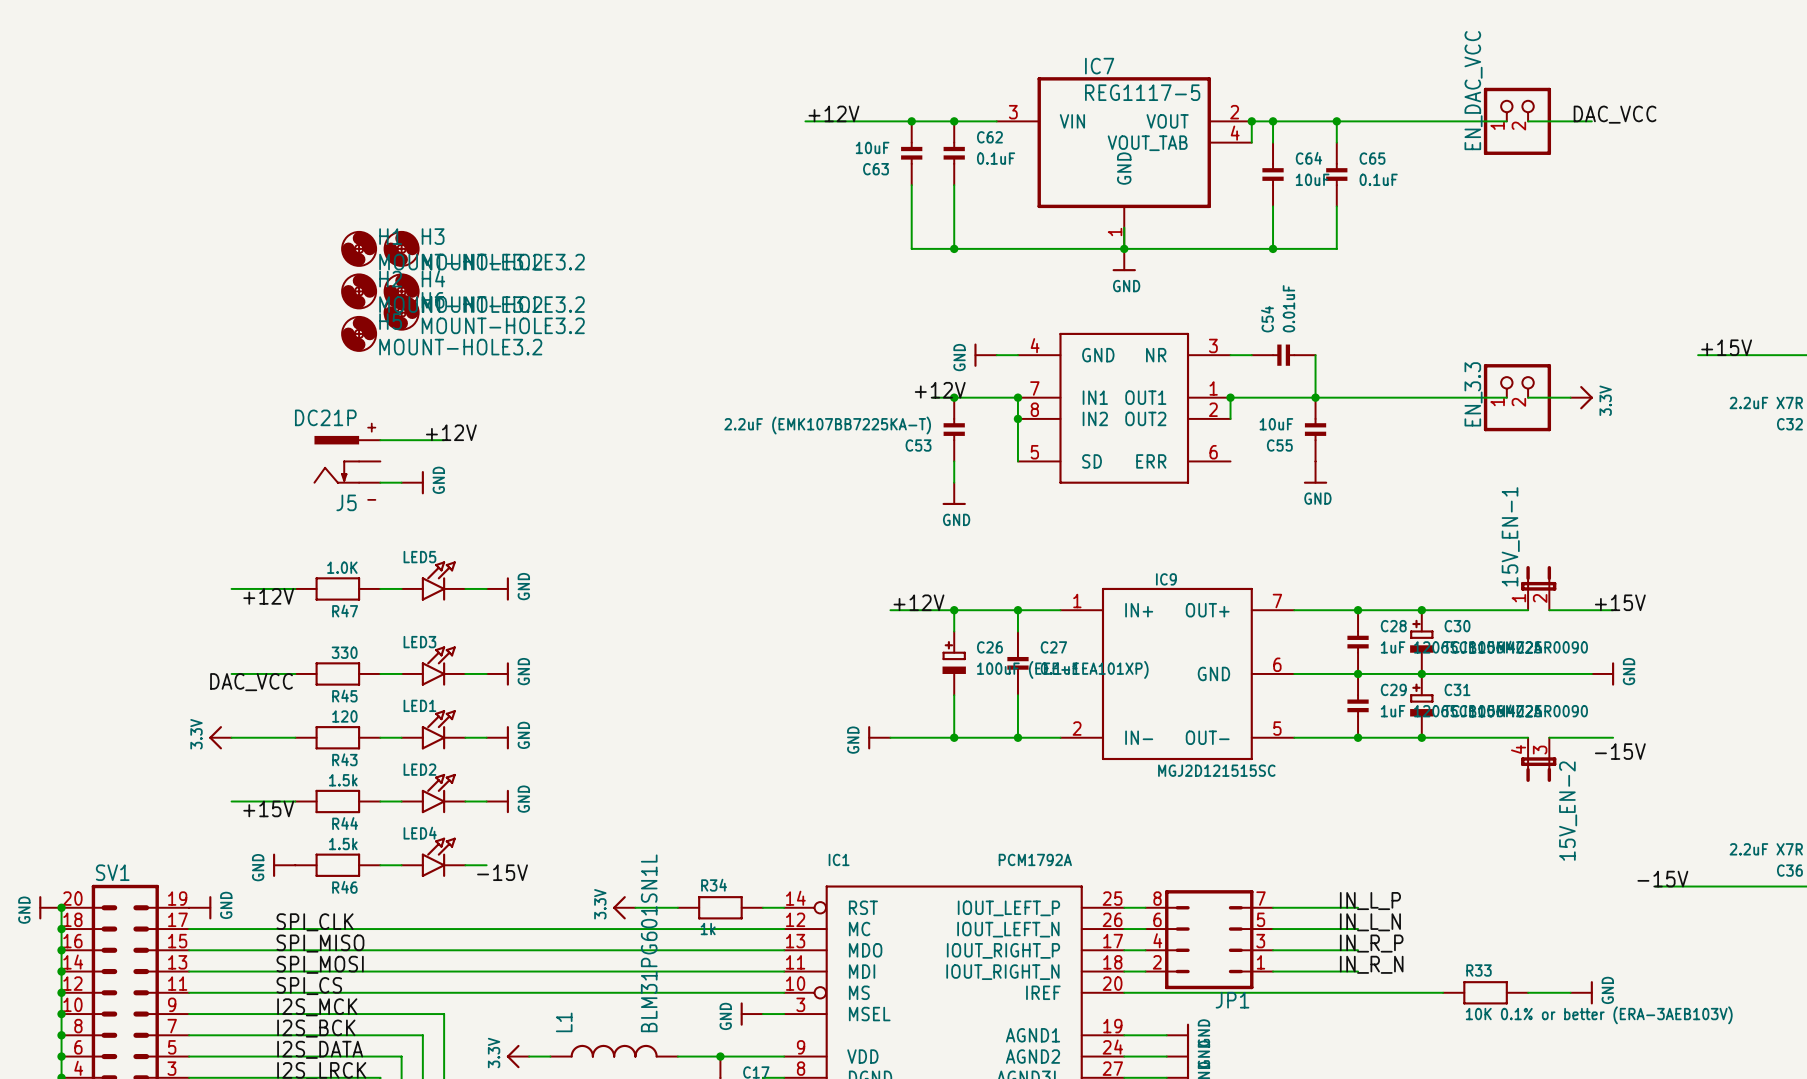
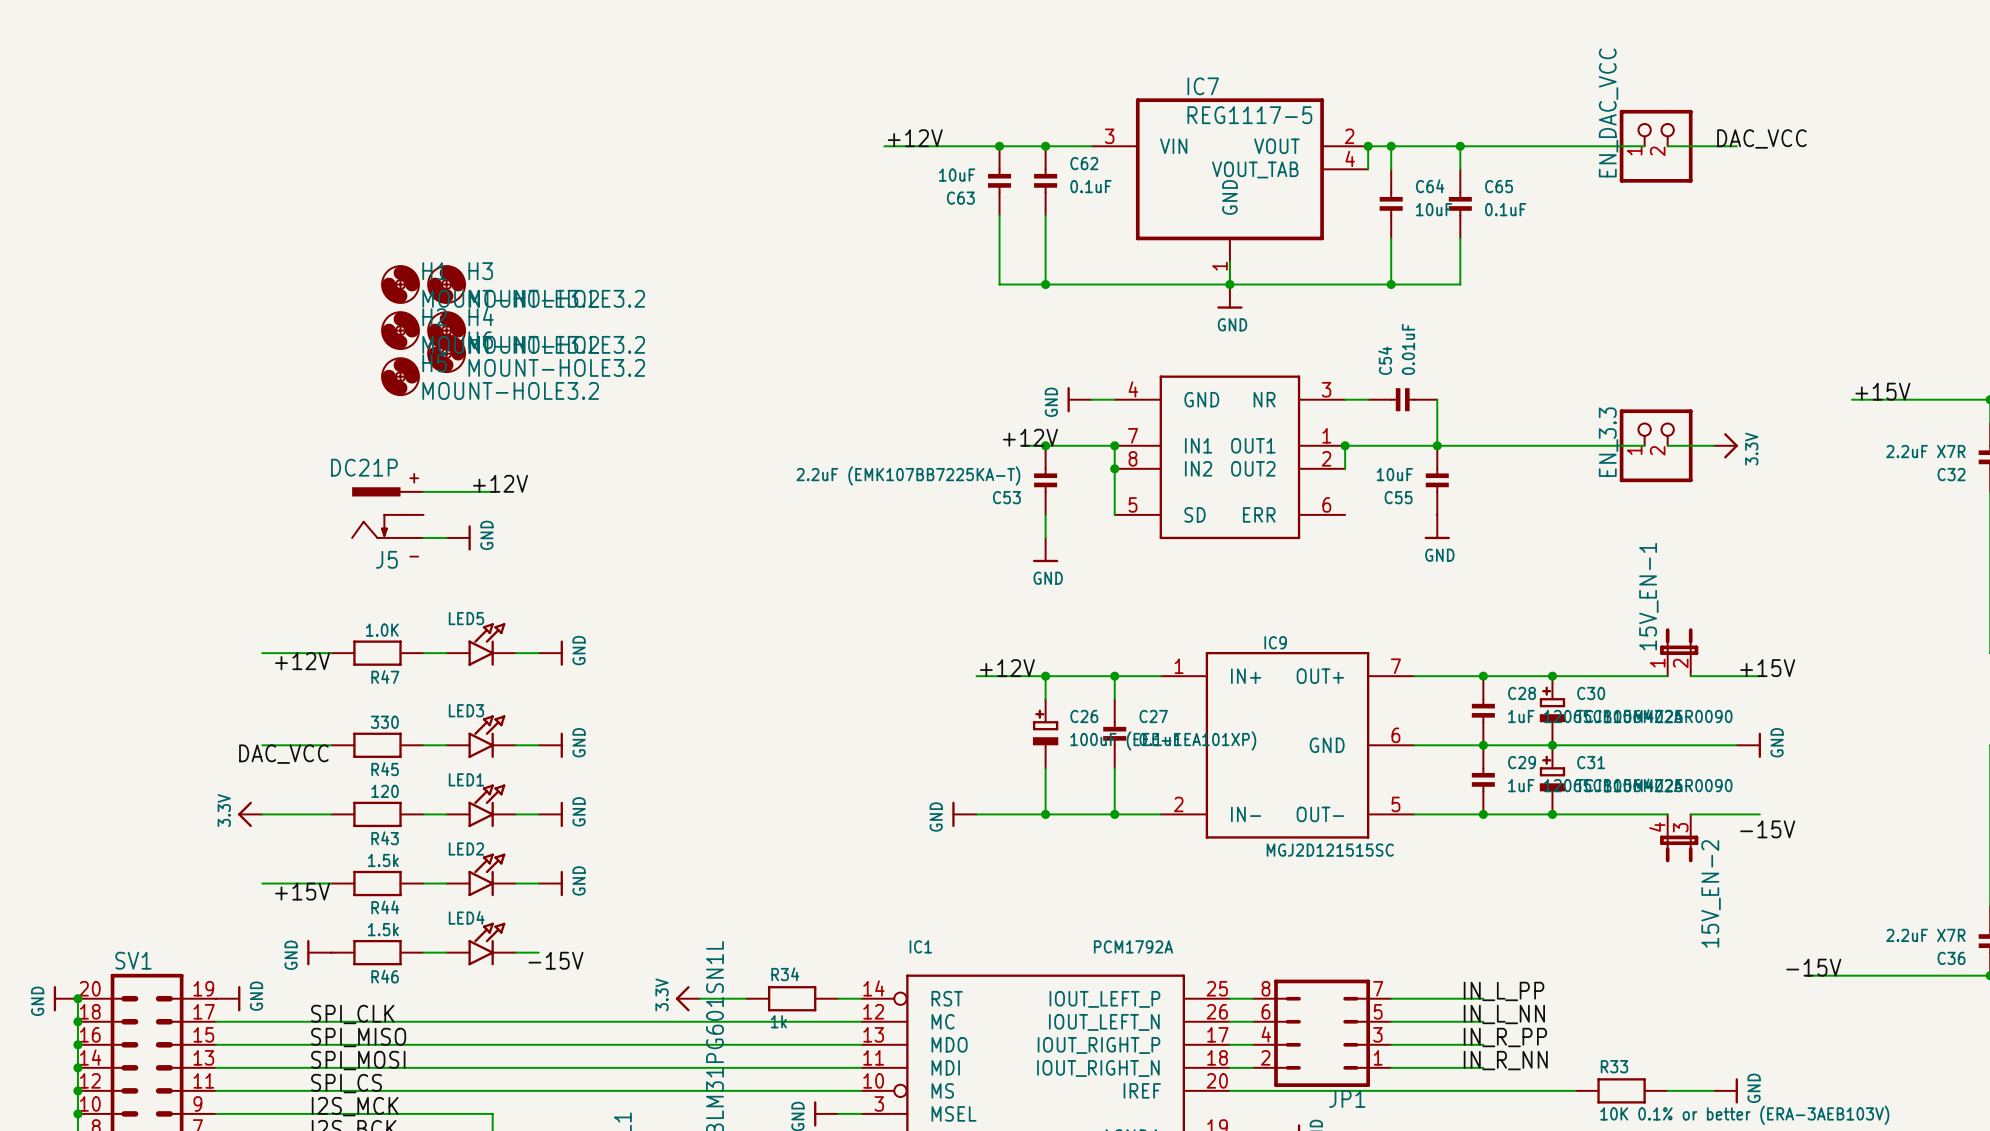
label: IN_L_P (1370, 901) -> IN_L_PP (1504, 991)
label: IN_L_N (1370, 922) -> IN_L_NN (1504, 1014)
label: IN_R_P (1371, 943) -> IN_R_PP (1505, 1037)
label: IN_R_N (1371, 964) -> IN_R_NN (1505, 1060)

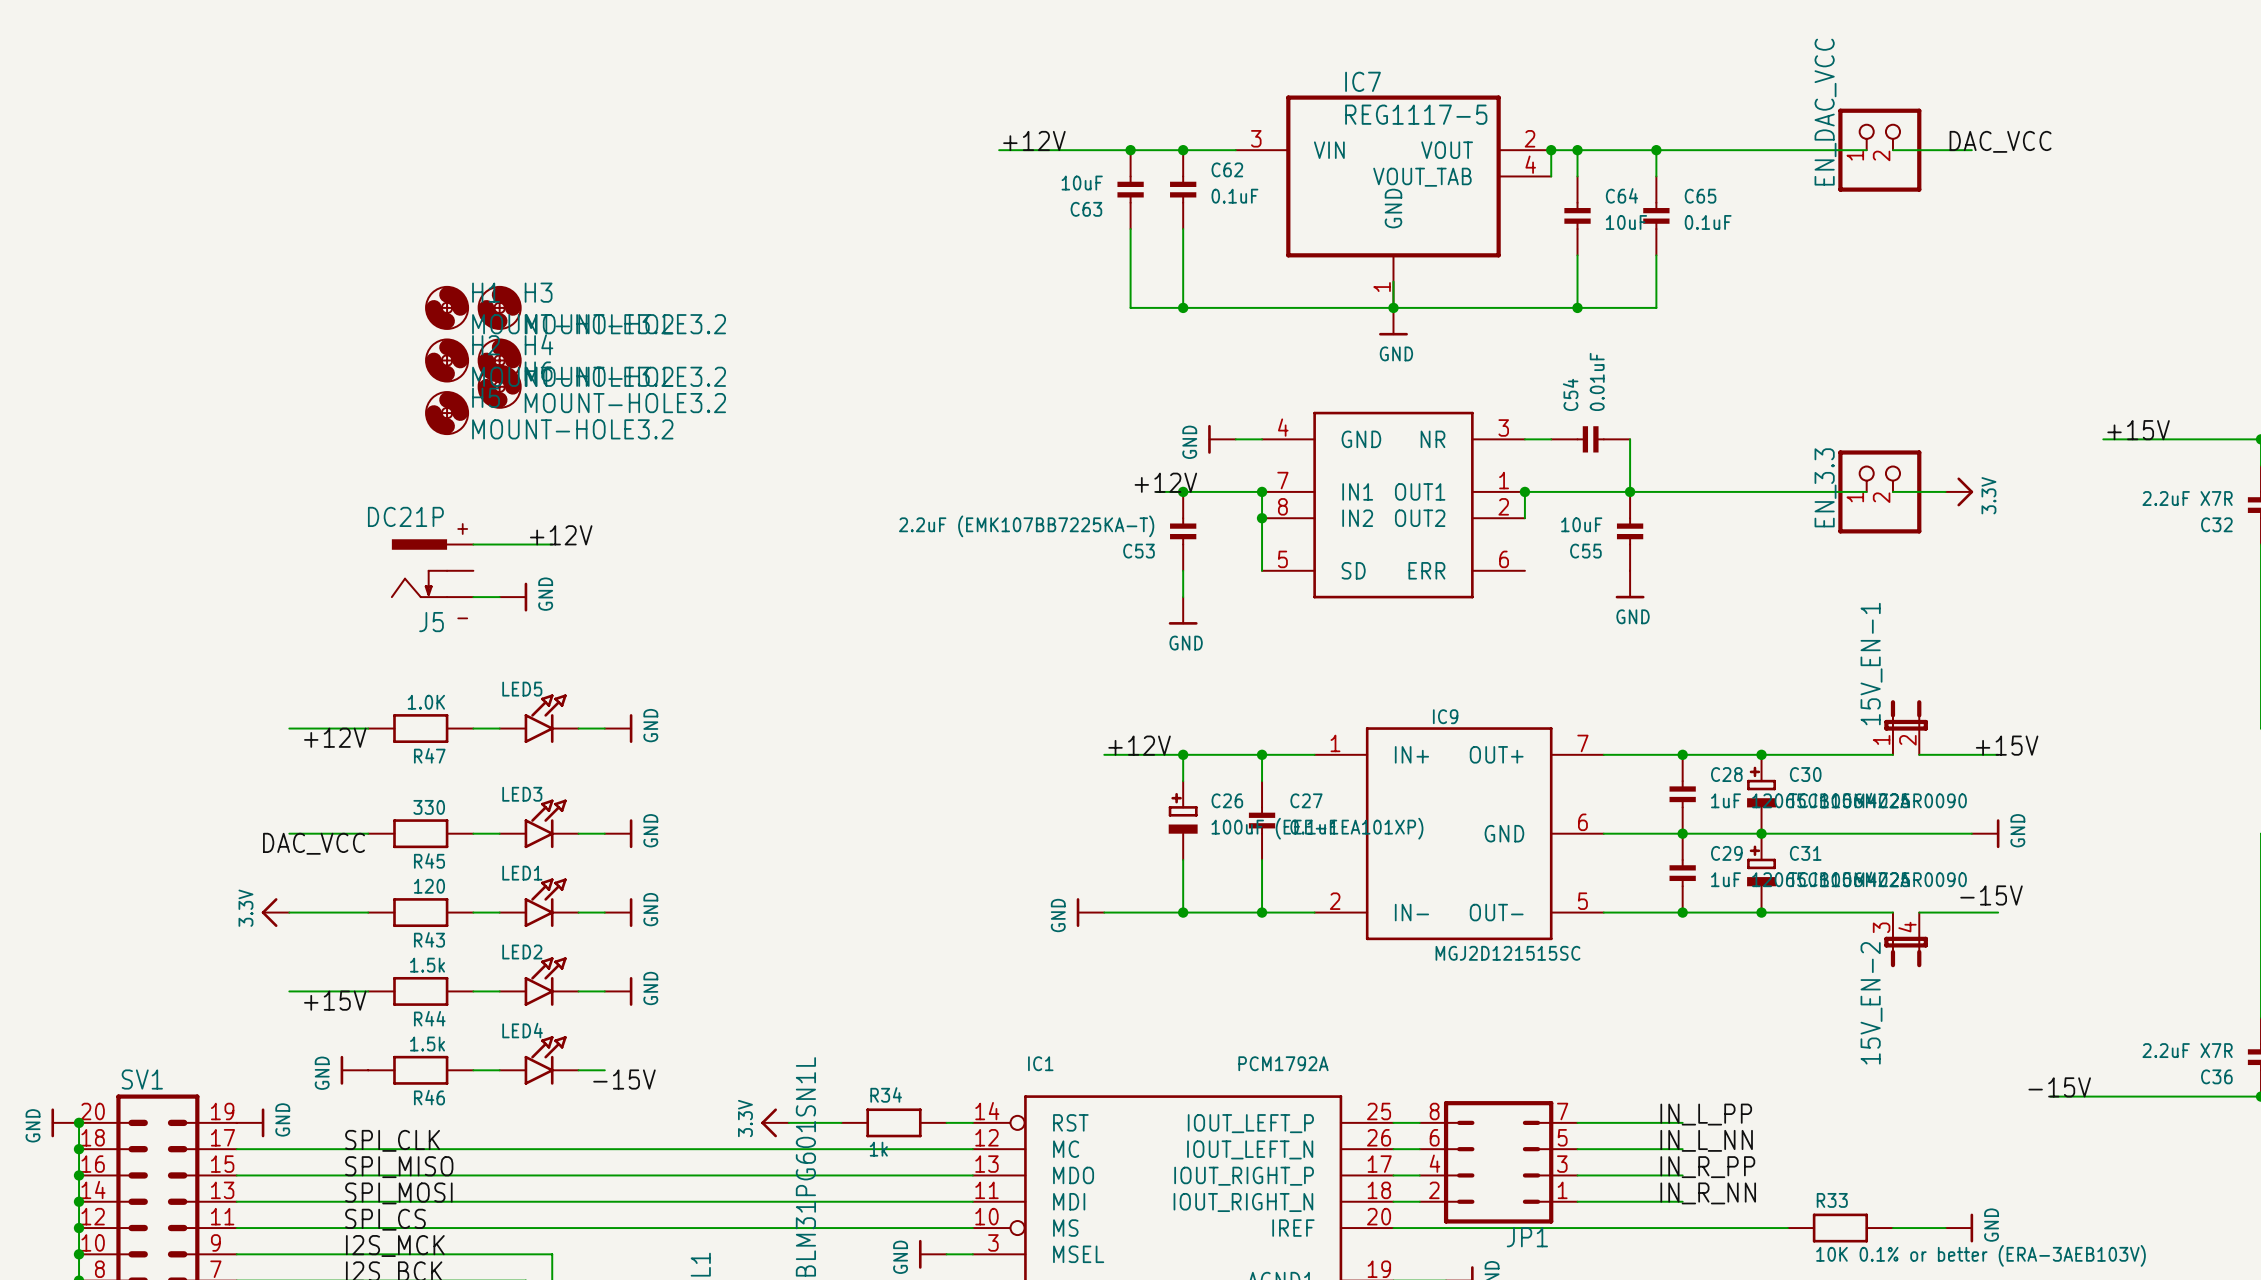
label position: -15V (1767, 829) -> -15V (1991, 895)
15V_EN-2 flip: as is (1679, 848) -> left-right (1906, 952)

